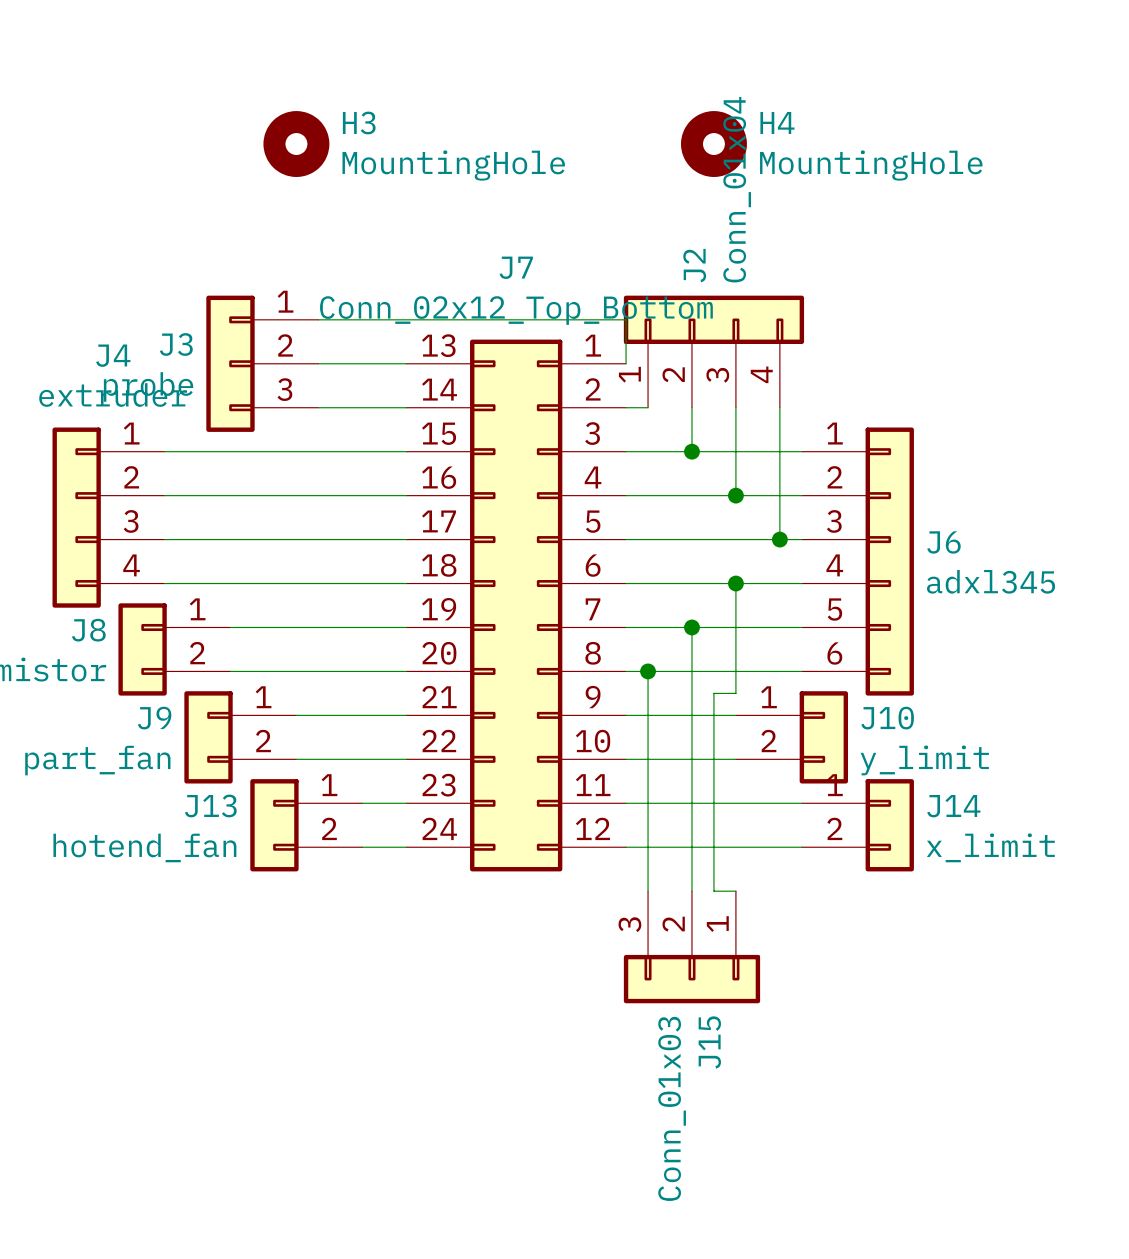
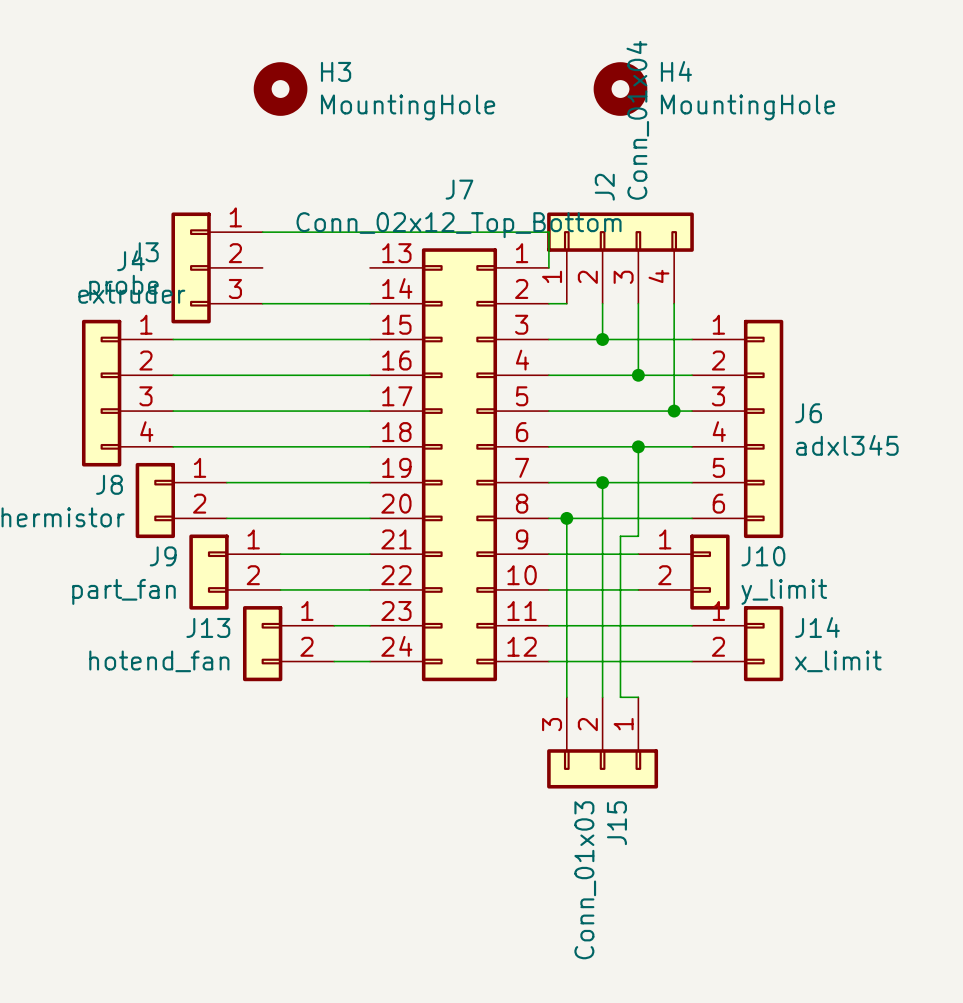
J3 position: (262, 363) -> (217, 267)
wire: (318, 363) (406, 363) -> none

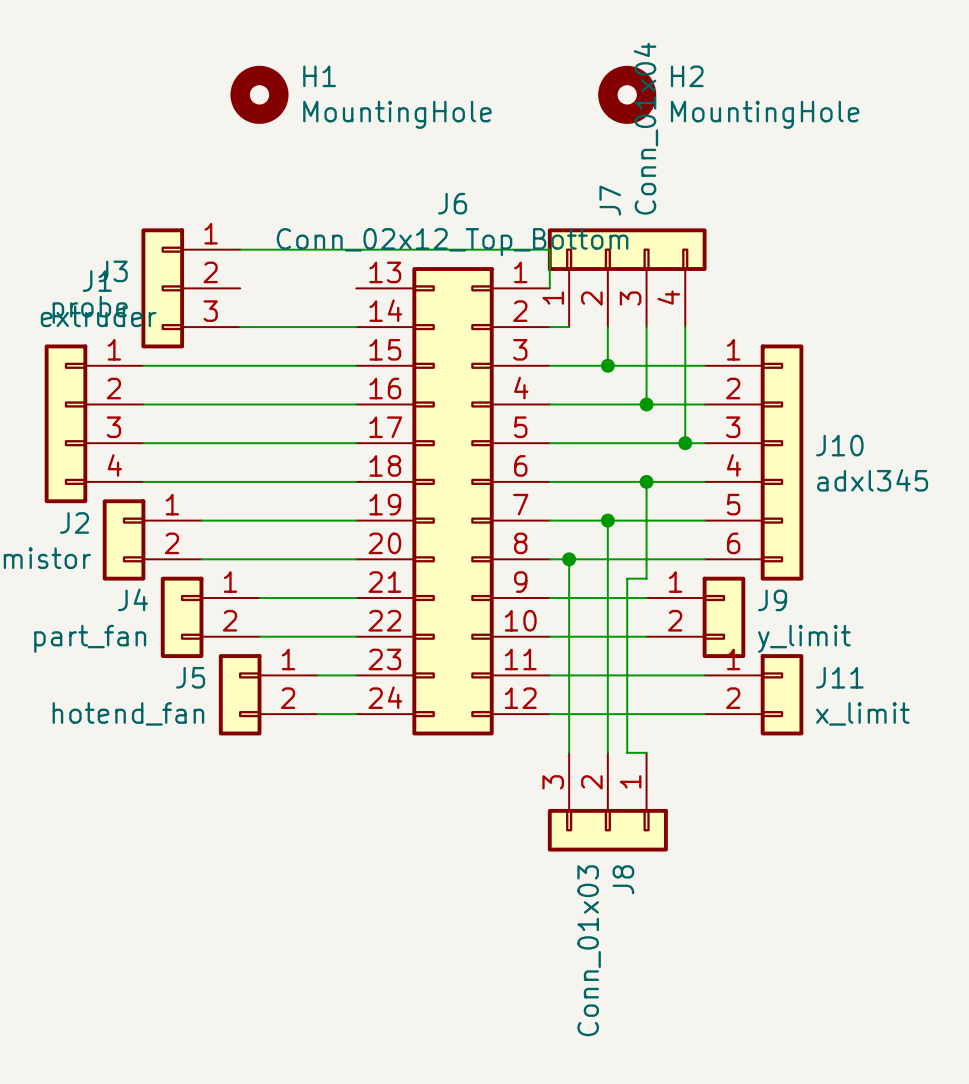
H3 name: H3 (336, 71) -> H1 (319, 76)
H4 name: H4 (676, 71) -> H2 (687, 76)
J2 name: J2 (604, 187) -> J7 (610, 200)
J7 name: J7 (459, 189) -> J6 (452, 203)
J4 name: J4 (130, 260) -> J1 (97, 281)
J6 name: J6 (808, 413) -> J10 (839, 445)
J8 name: J8 (109, 484) -> J2 (74, 522)
J9 name: J9 (163, 556) -> J4 (133, 599)
J10 name: J10 (763, 556) -> J9 (772, 600)
J13 name: J13 (208, 627) -> J5 (190, 677)
J14 name: J14 (817, 627) -> J11 (839, 677)
J15 name: J15 (616, 823) -> J8 (623, 879)

